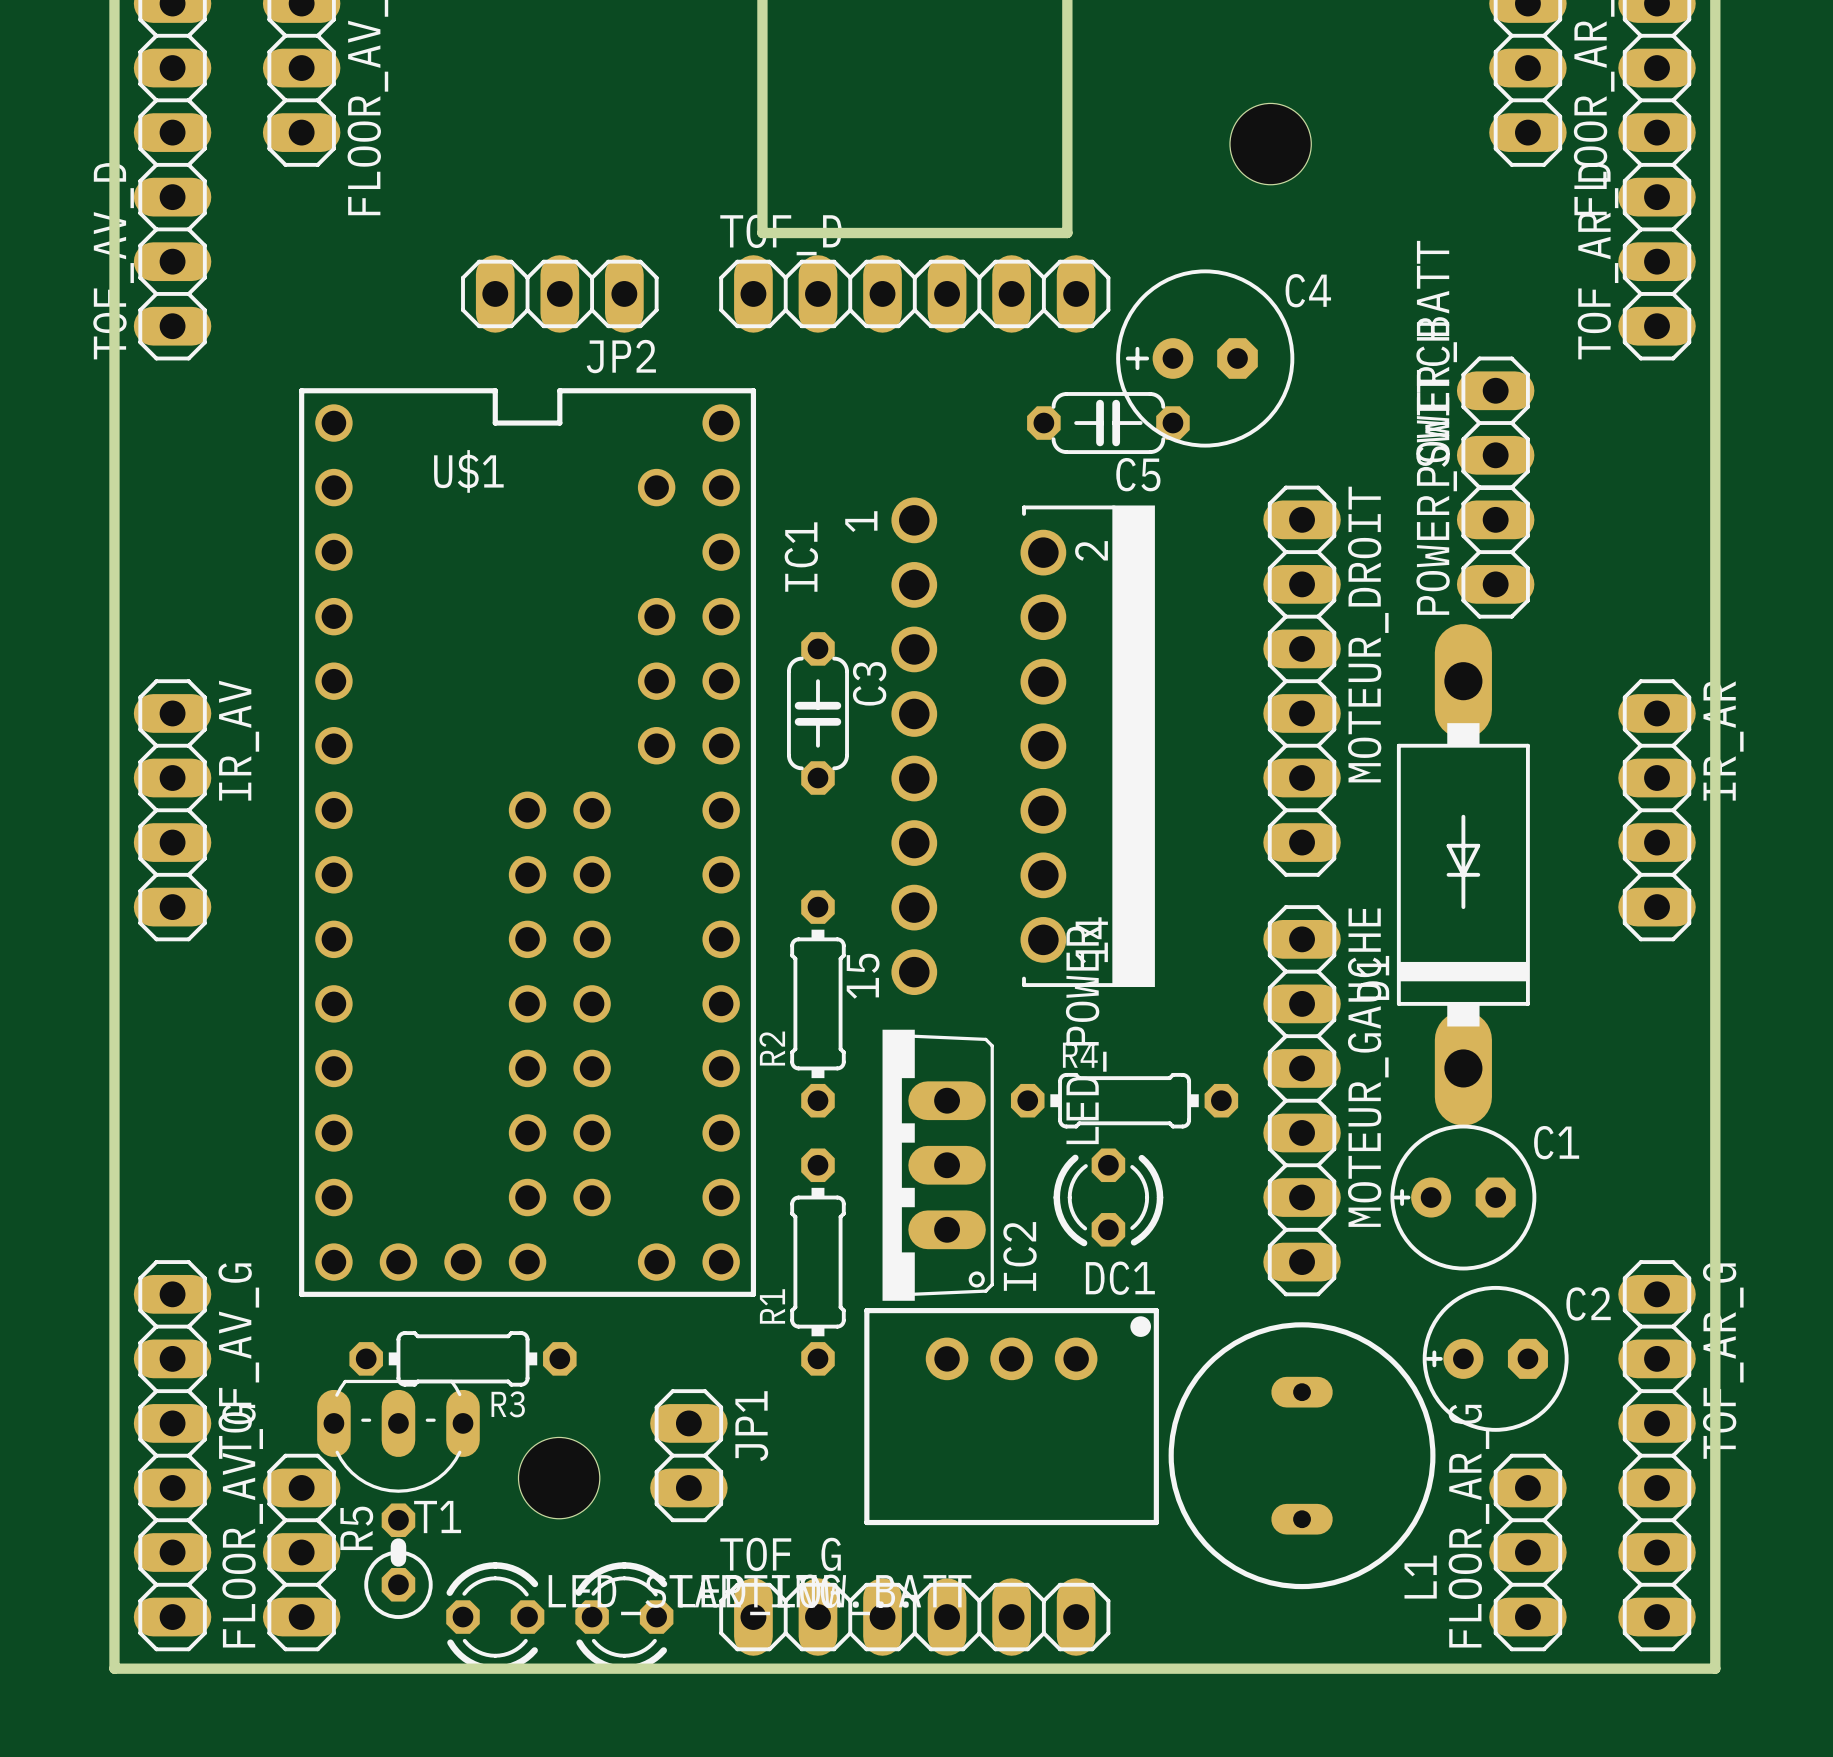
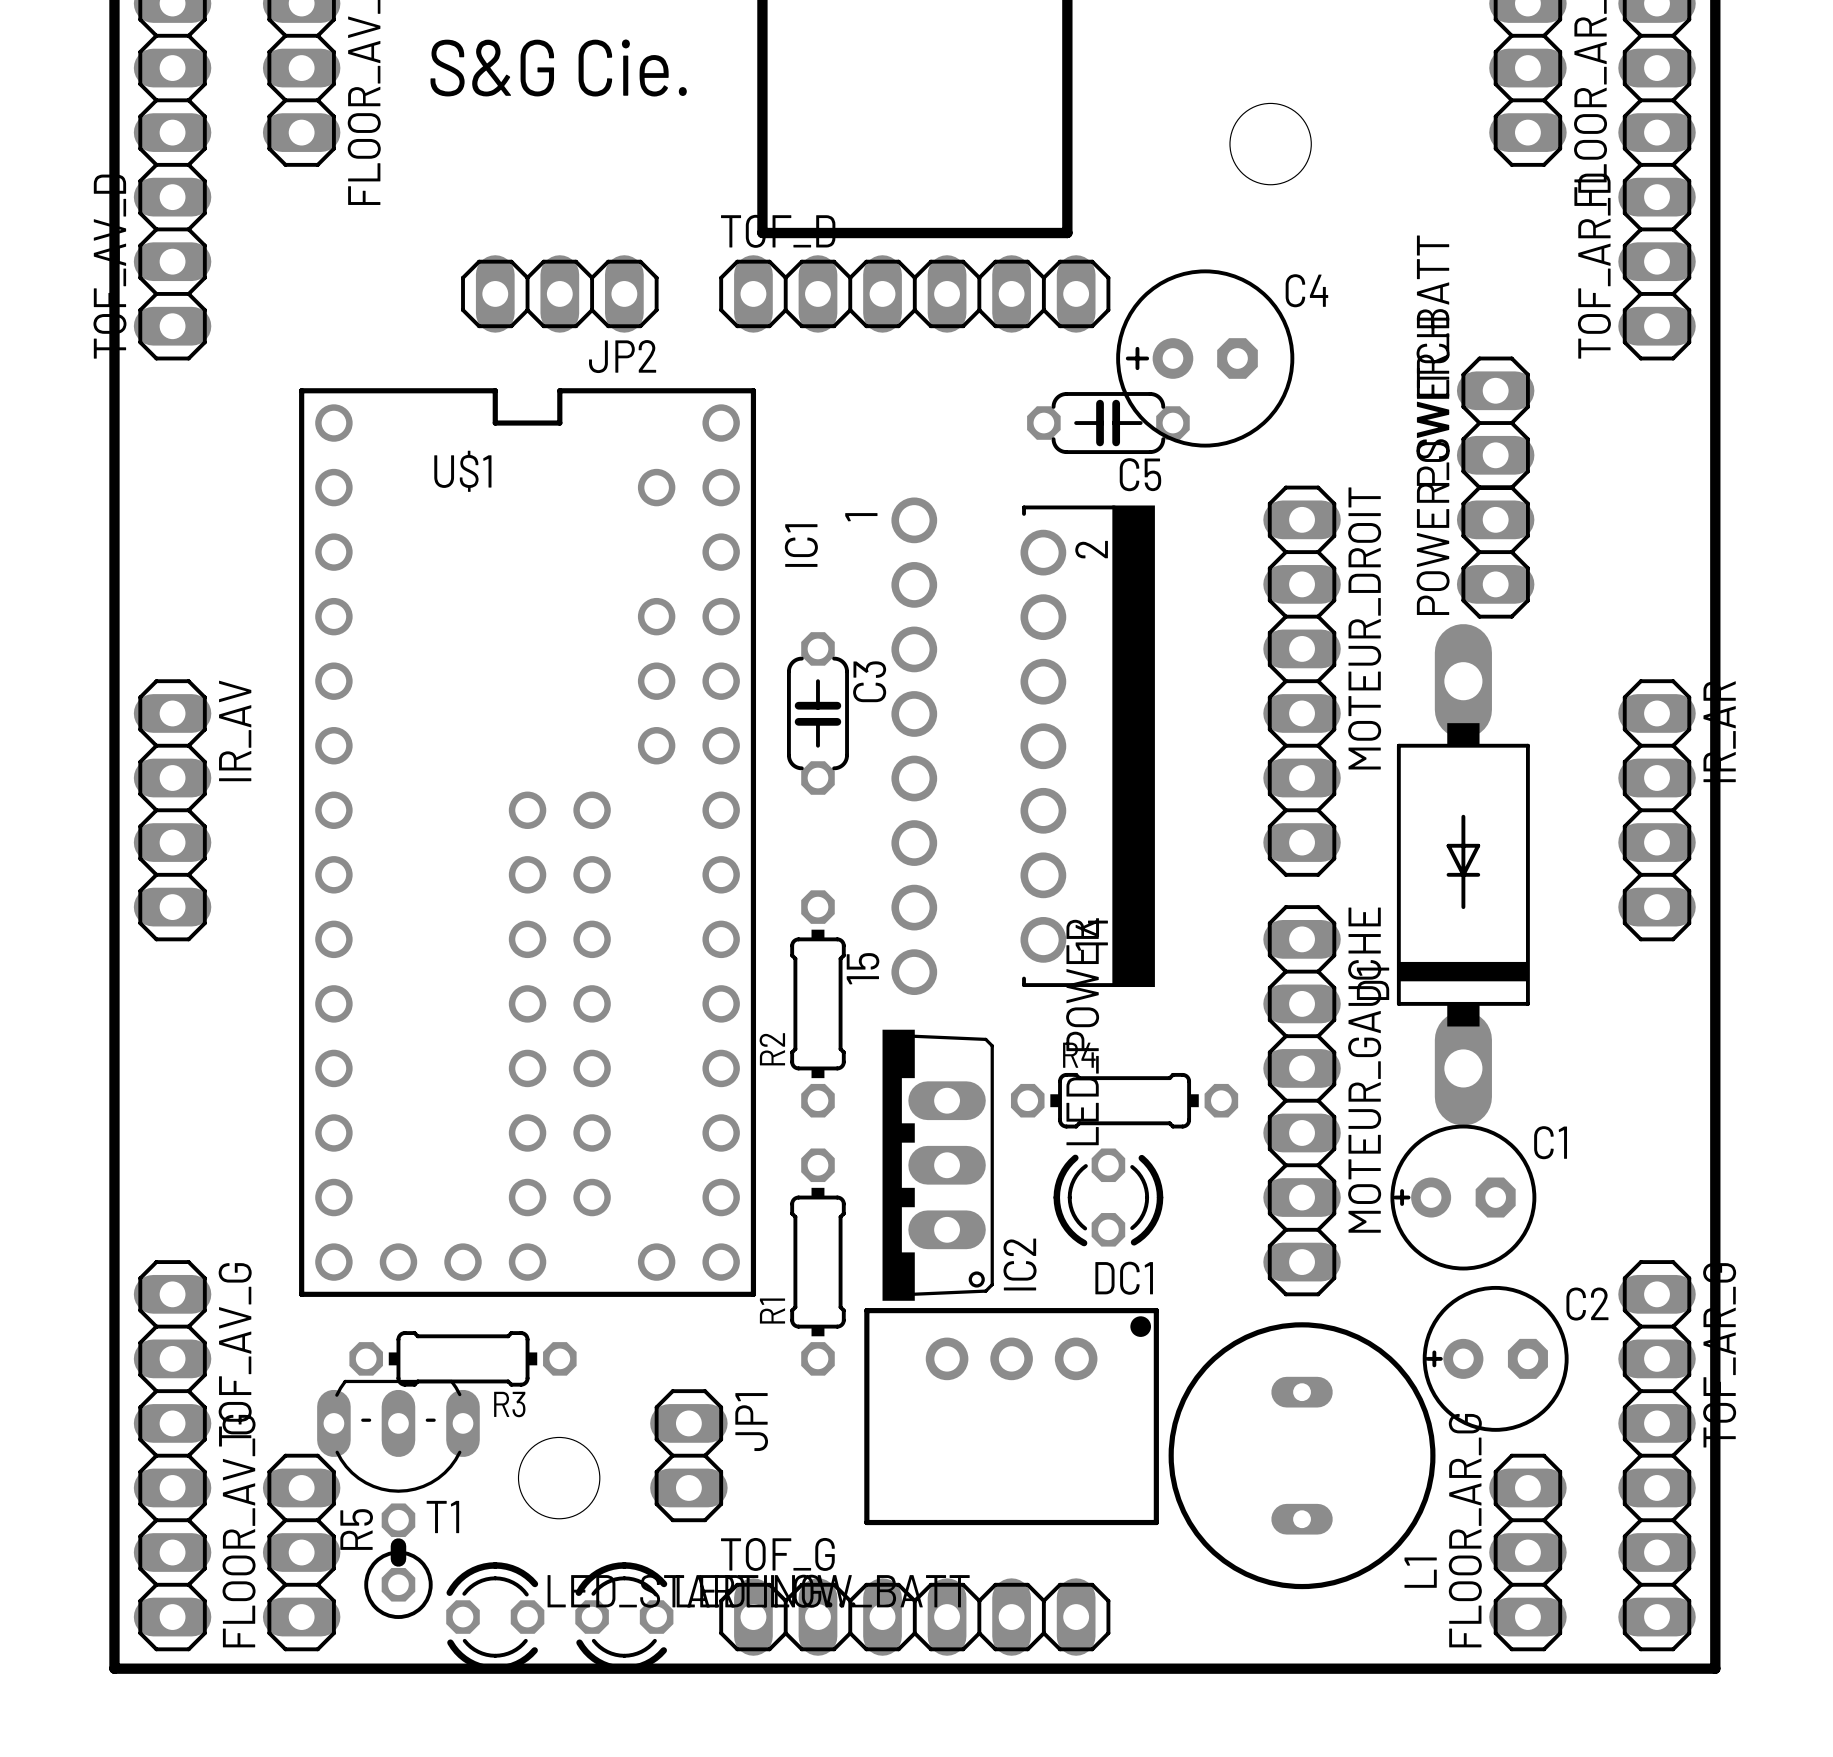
text: none -> S&G Cie. (558, 68)

